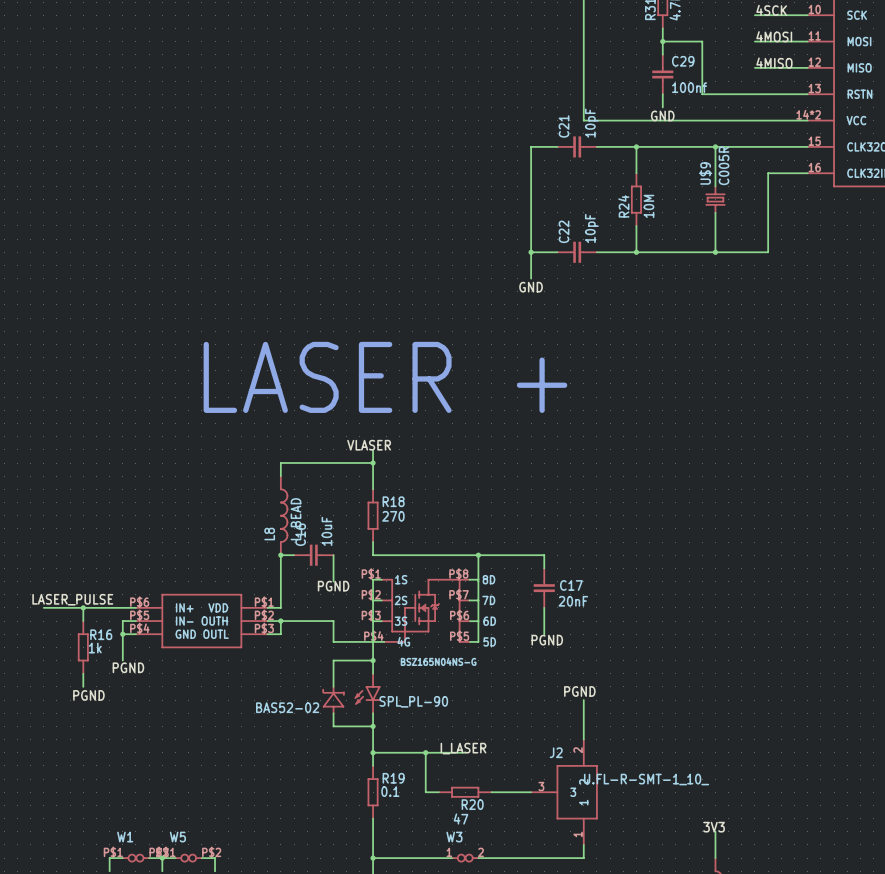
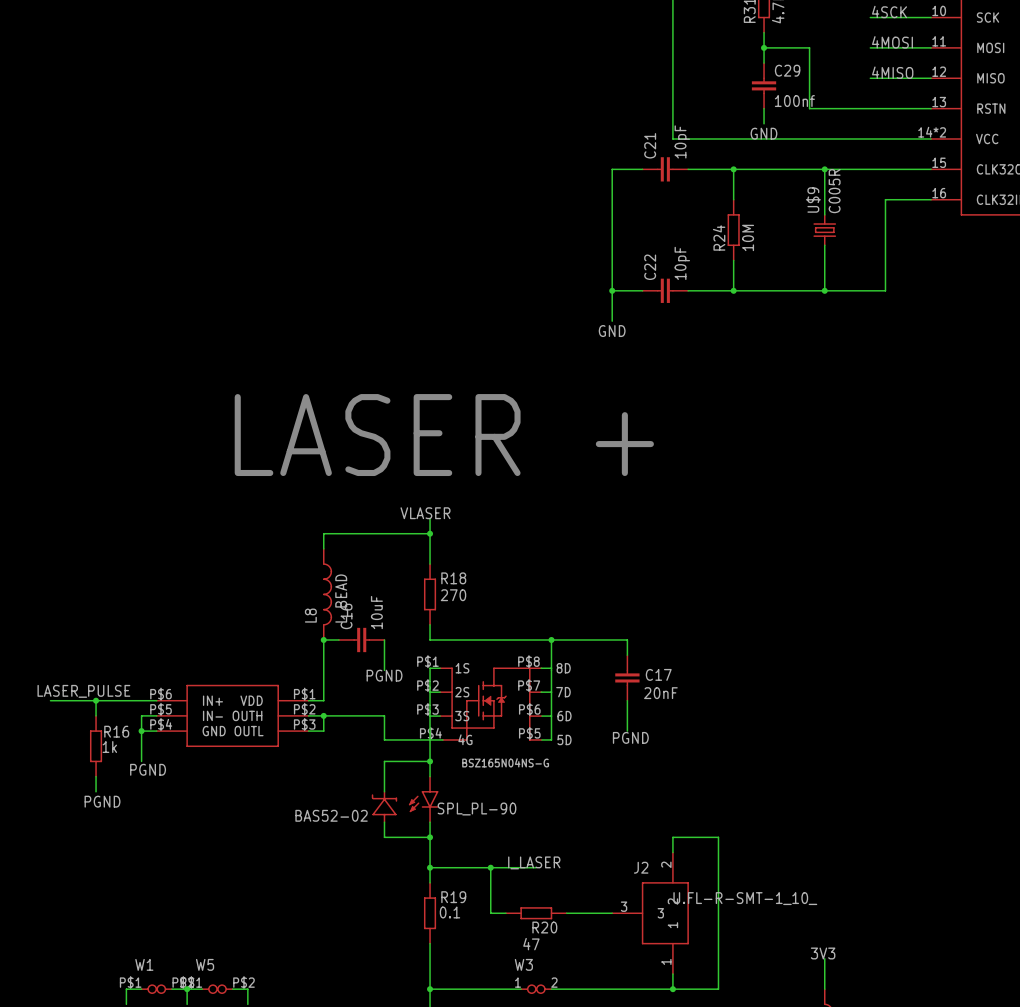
label: PGND (579, 691) -> none
wire: (583, 700) (583, 726) -> (672, 989) (718, 989) (718, 837) (672, 837)
junction: none -> (672, 989)

